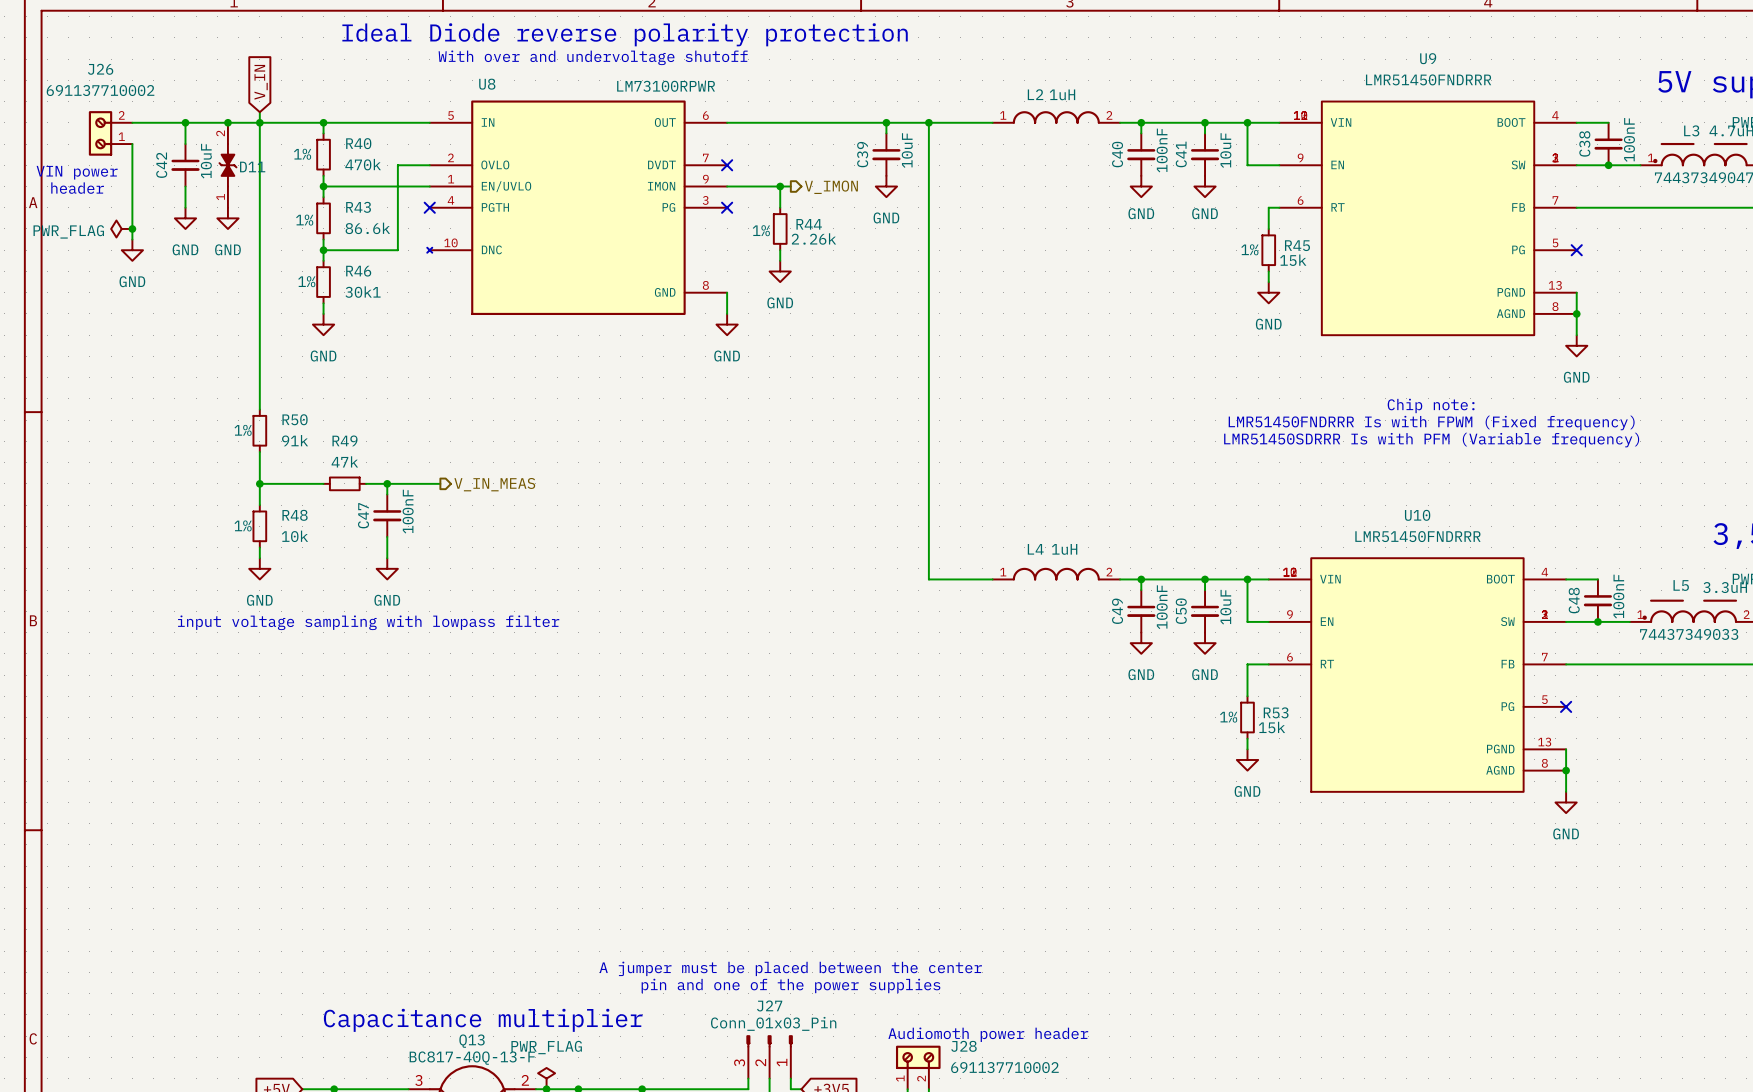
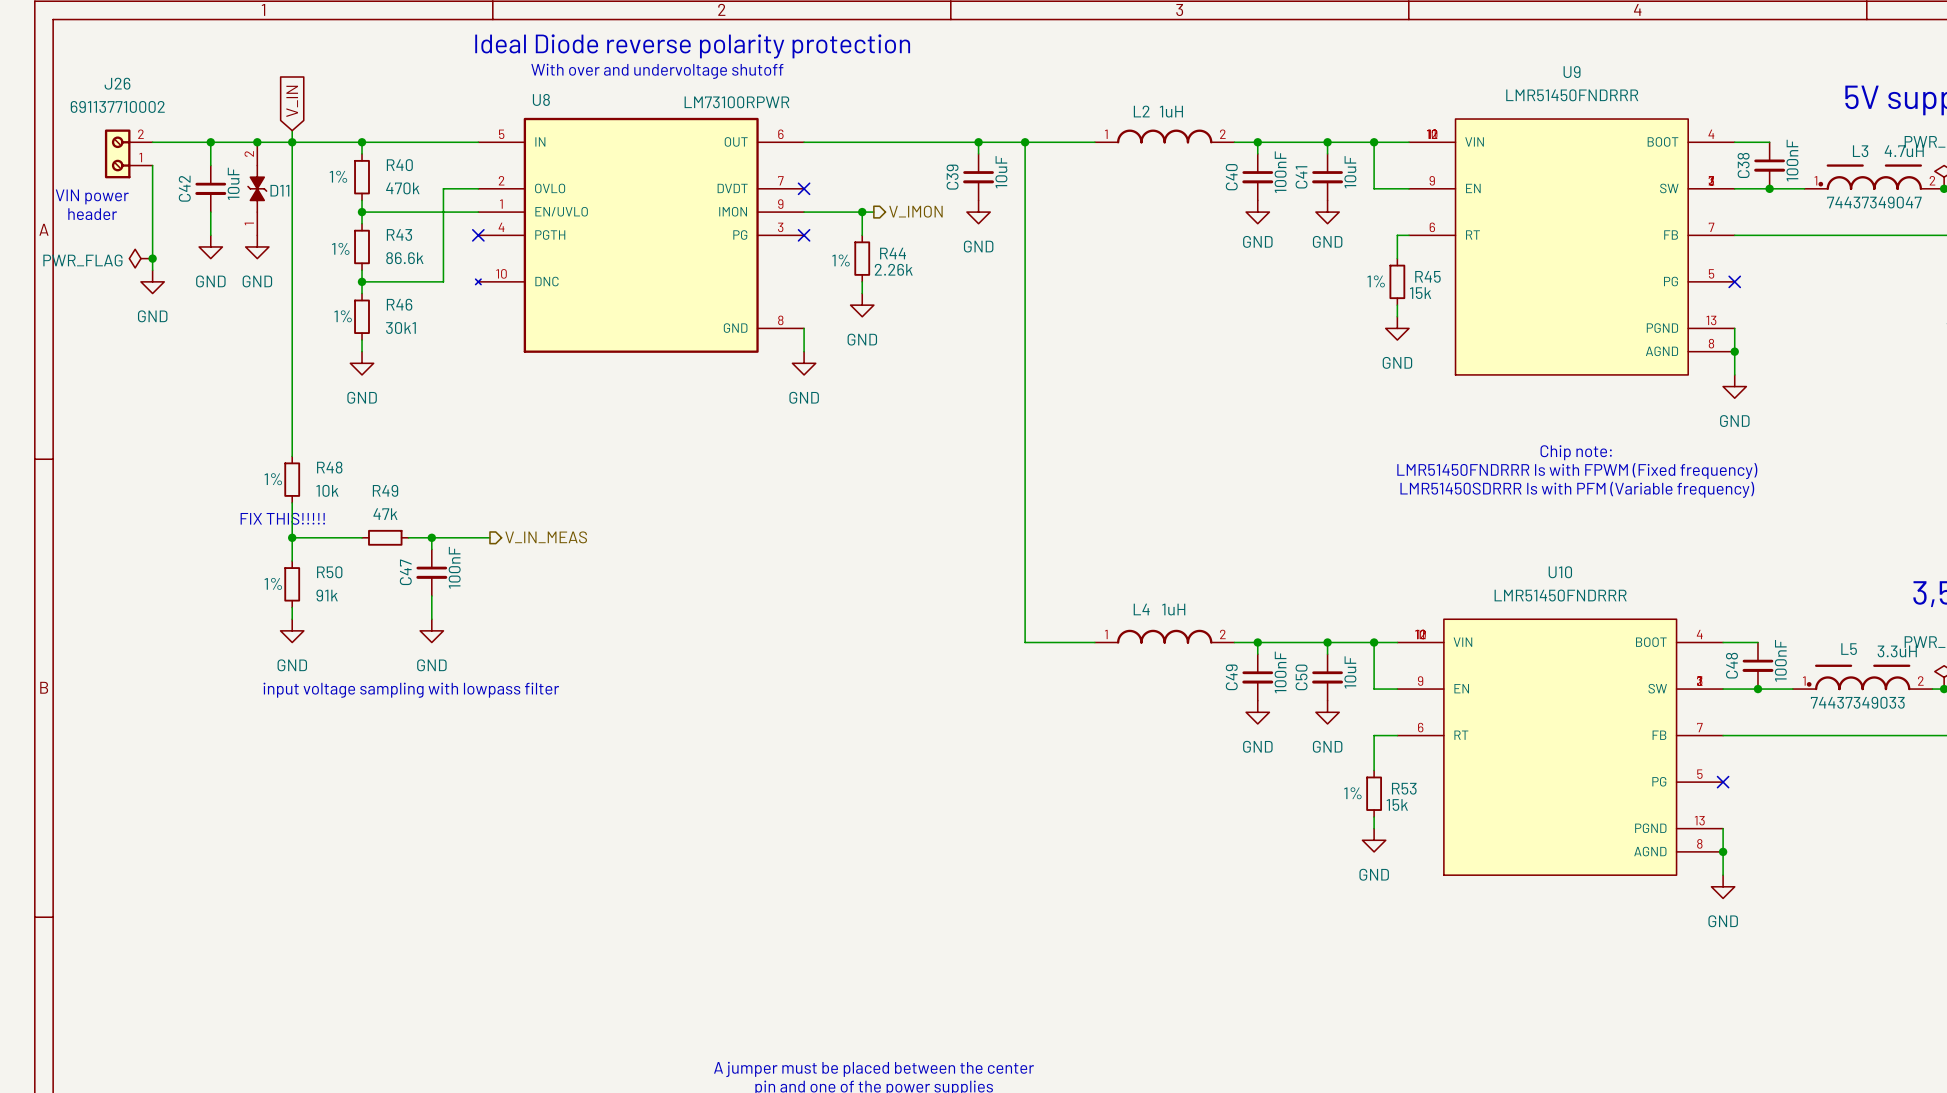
R50 name: R50 (295, 419) -> R48 (329, 467)
R50 value: 91k (295, 440) -> 10k (327, 490)
text: none -> FIX THIS!!!!! (282, 518)
R48 name: R48 (295, 515) -> R50 (329, 572)
R48 value: 10k (294, 536) -> 91k (327, 595)

